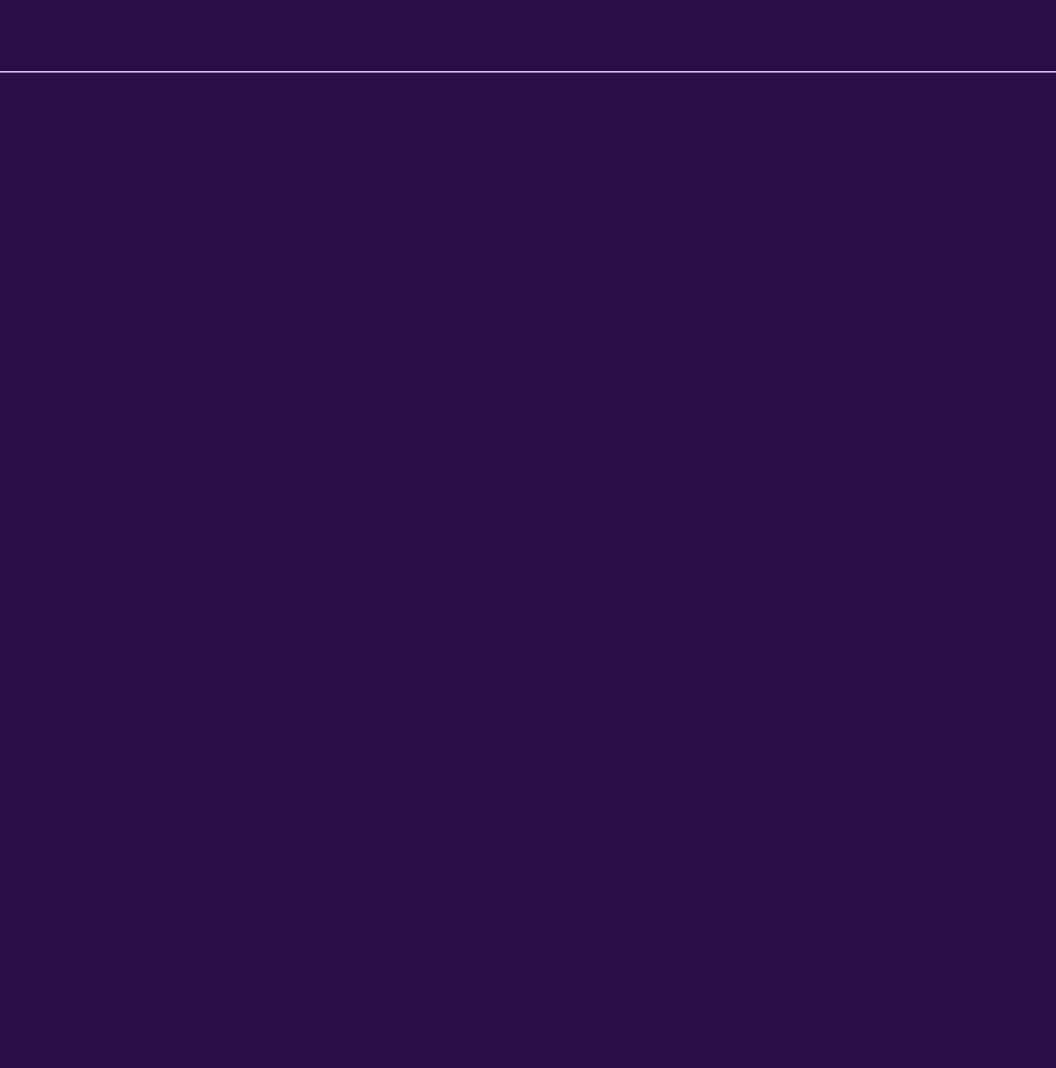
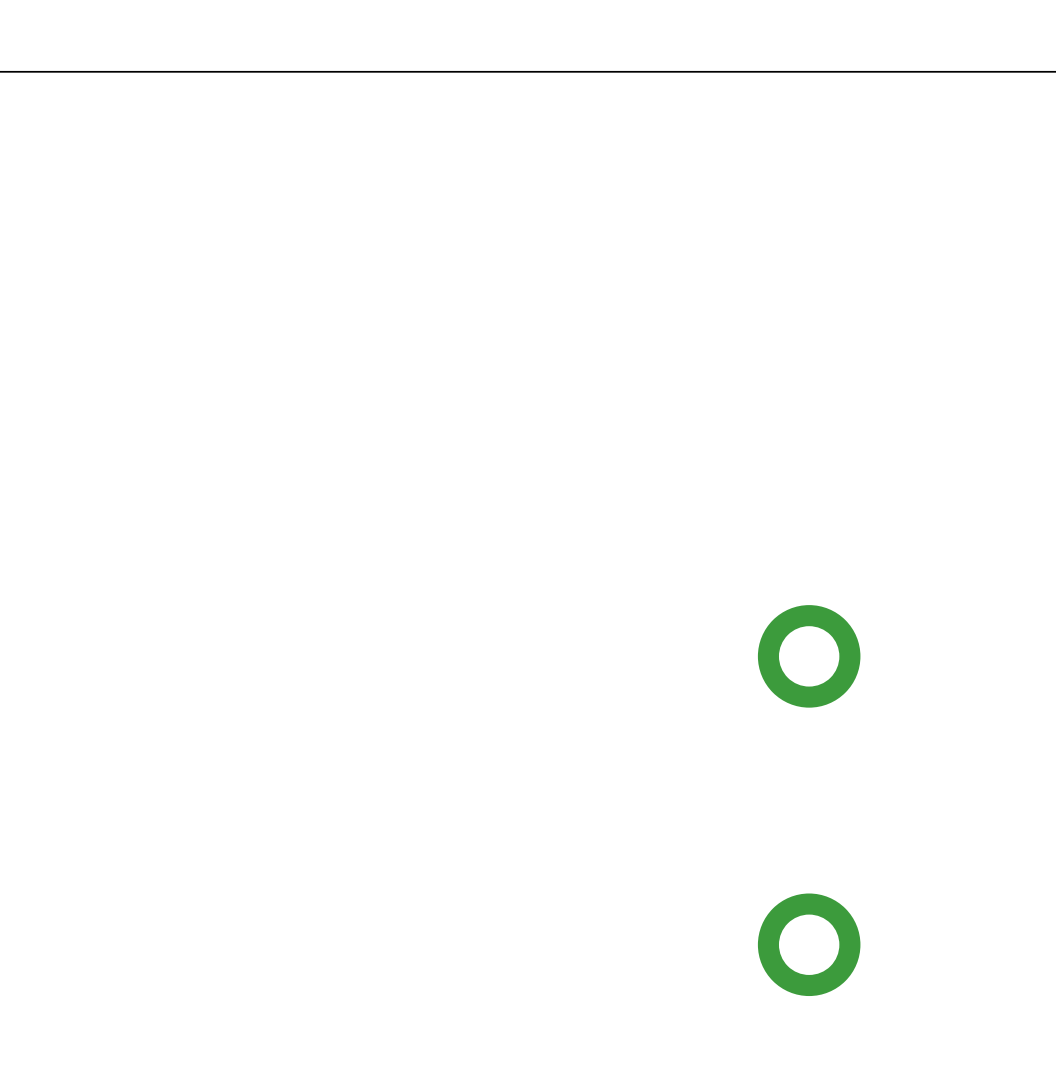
part: none -> (809, 656)
part: none -> (809, 944)

